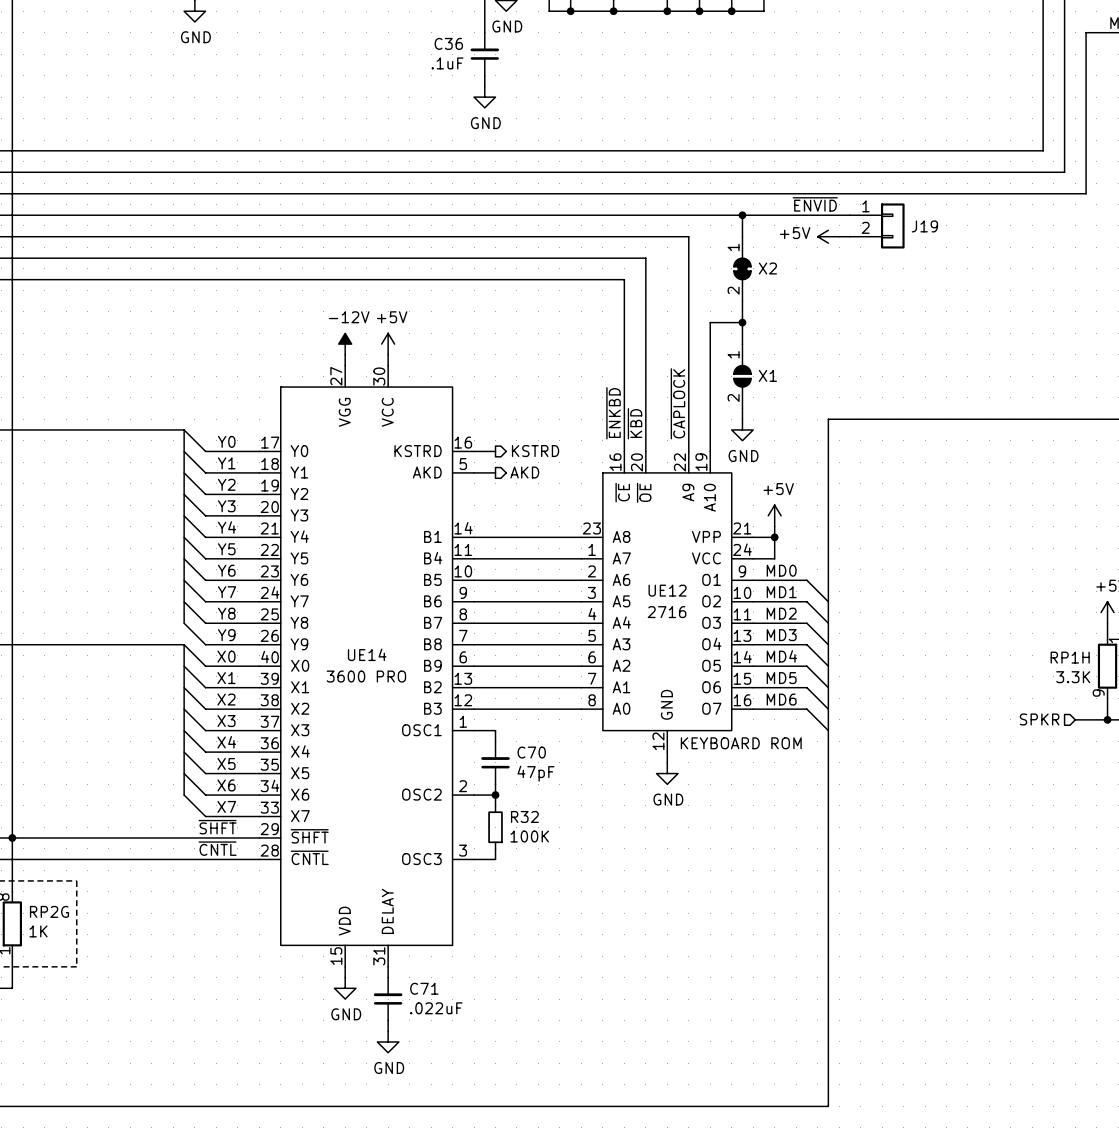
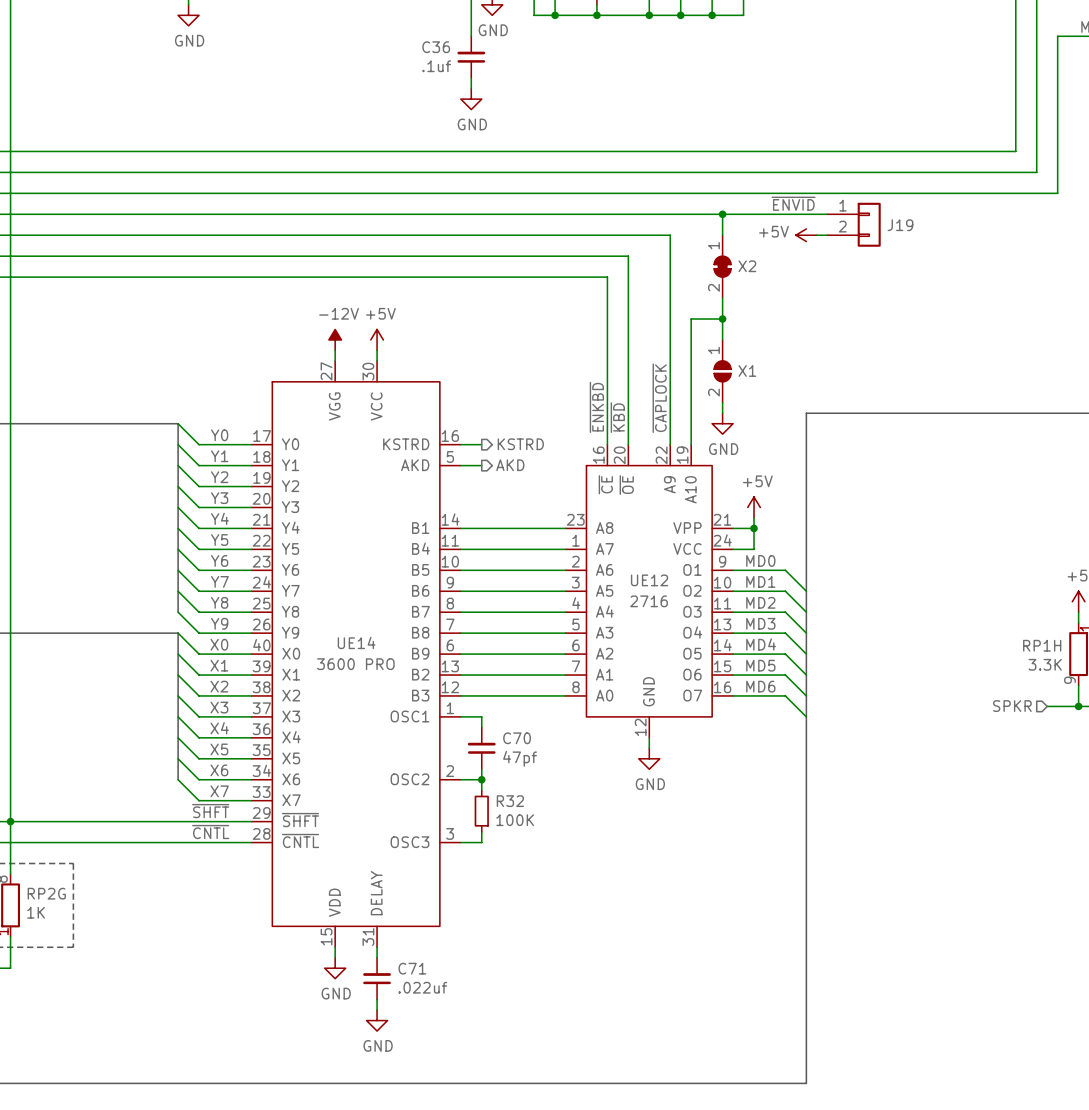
C36 value: .1uF (447, 63) -> .1uf (436, 66)
text: KEYBOARD ROM (741, 743) -> none
C70 value: 47pF (536, 773) -> 47pf (520, 758)
C71 value: .022uF (436, 1008) -> .022uf (422, 987)

